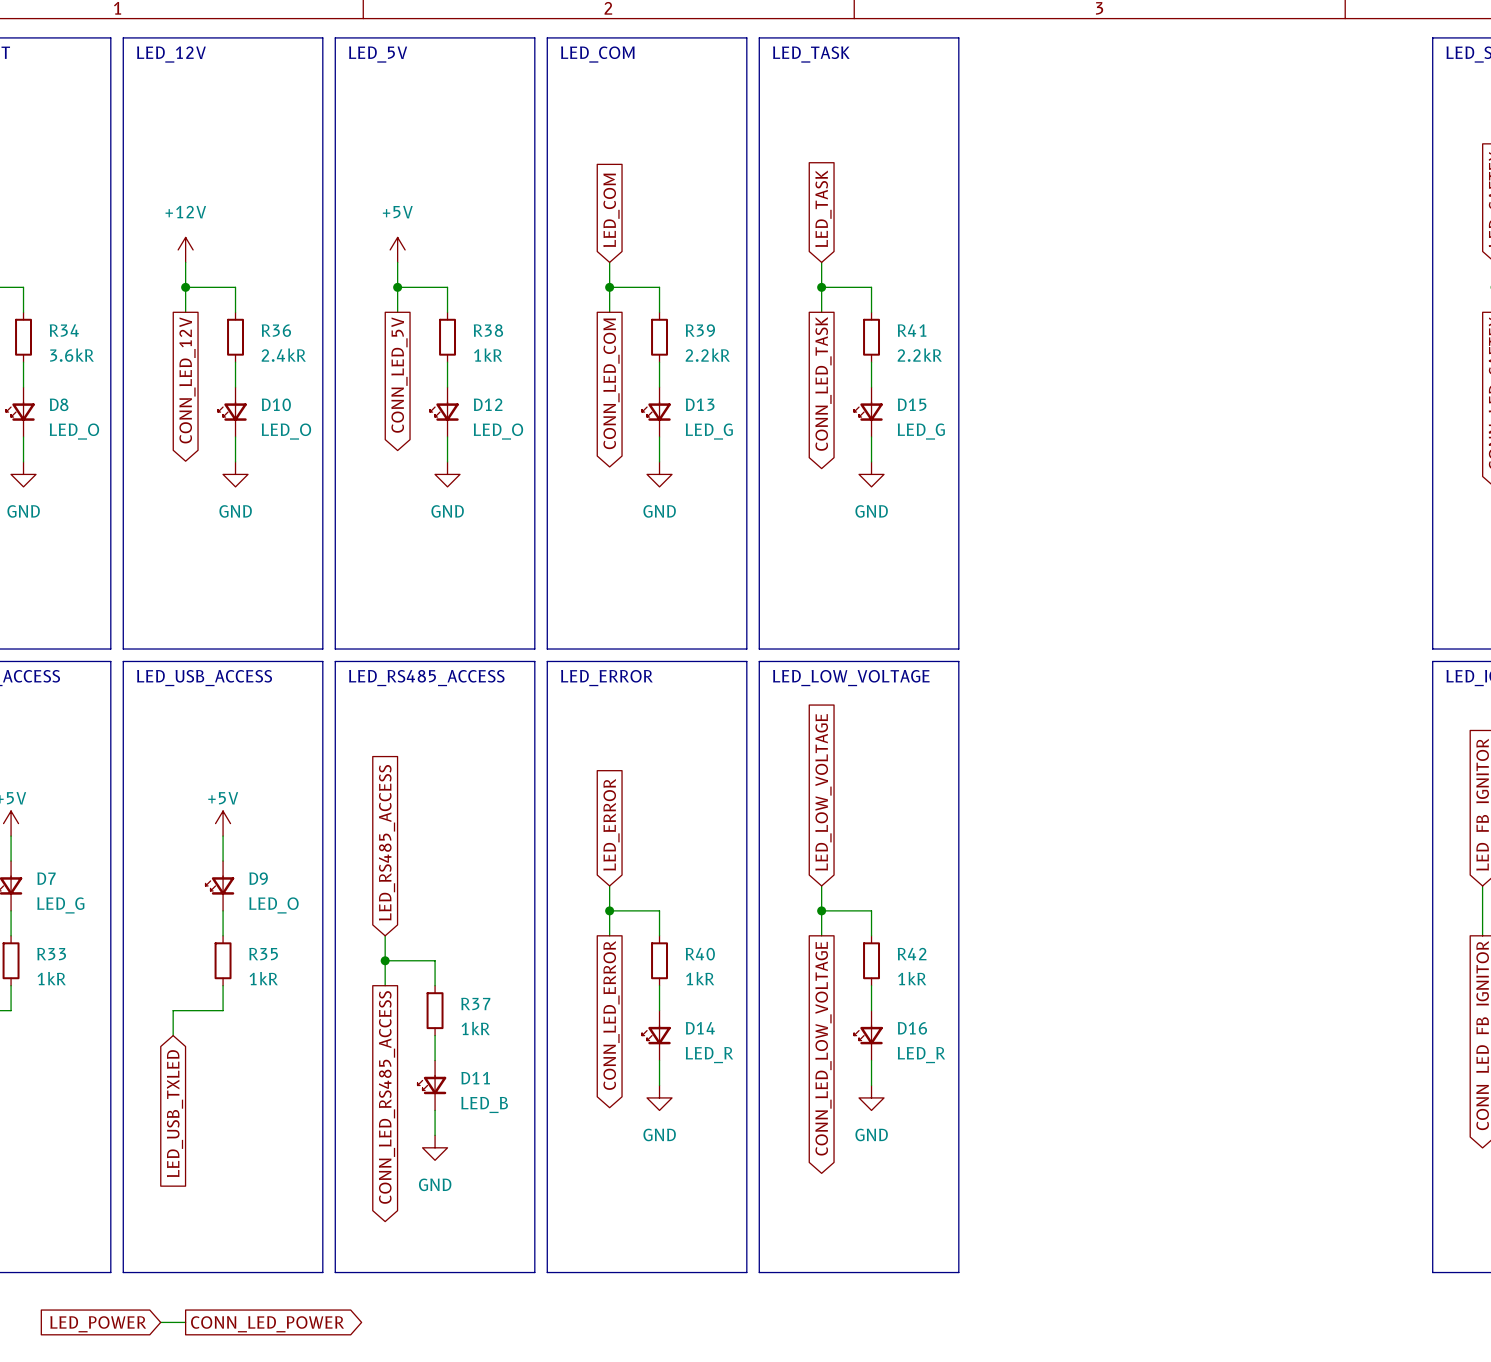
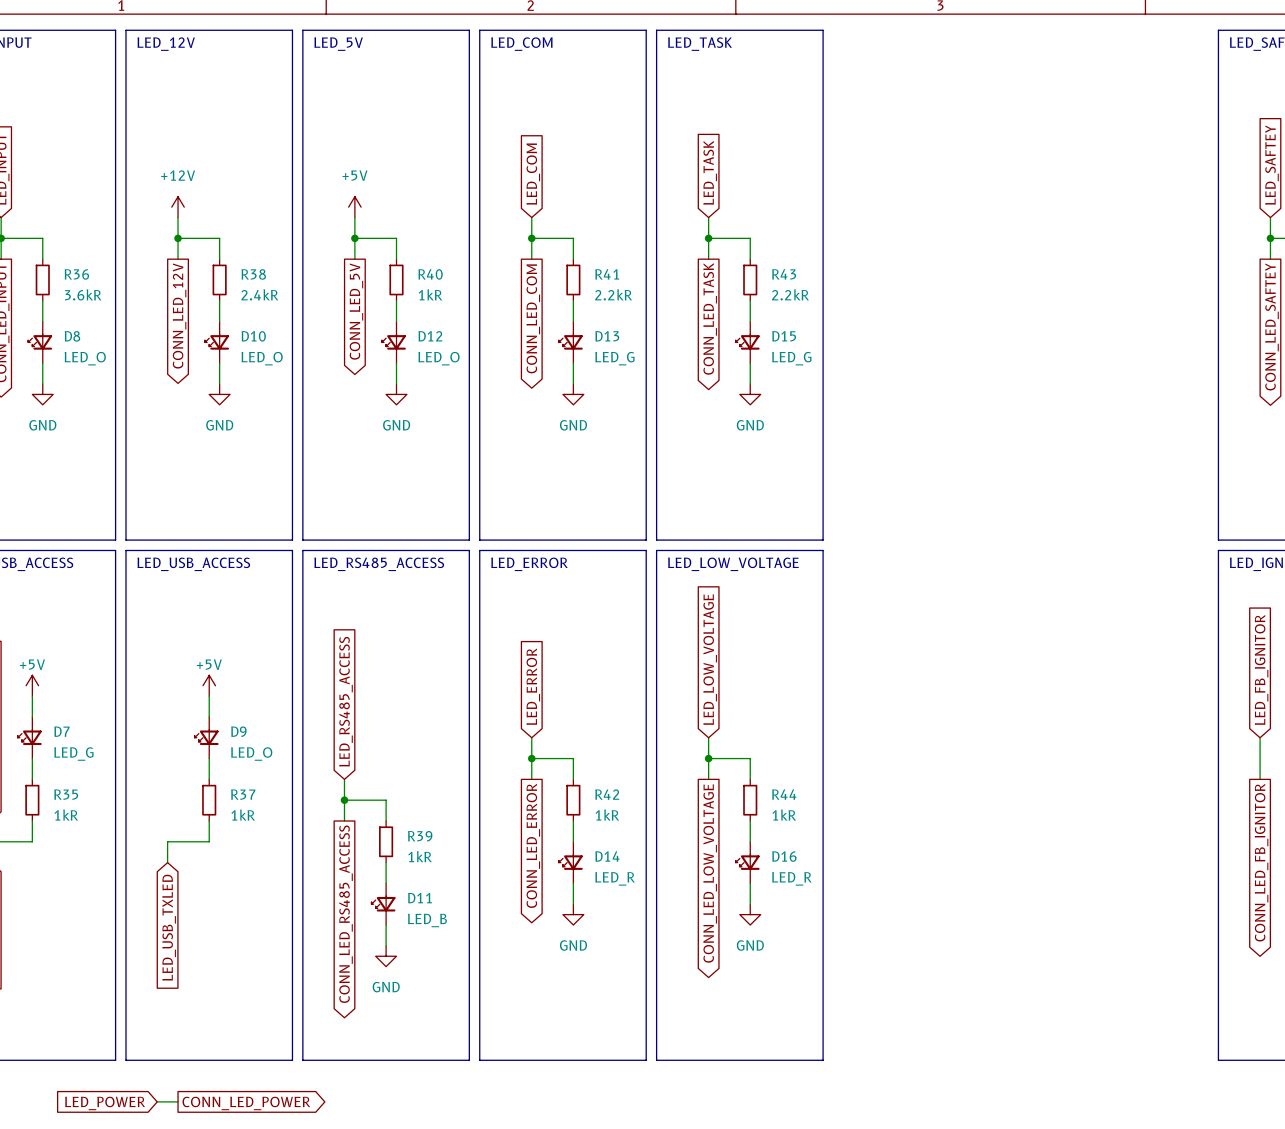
R34 name: R34 (64, 330) -> R36 (76, 274)
R36 name: R36 (276, 330) -> R38 (253, 274)
R38 name: R38 (488, 330) -> R40 (430, 274)
R39 name: R39 (700, 330) -> R41 (607, 274)
R41 name: R41 (912, 330) -> R43 (784, 274)
R33 name: R33 (51, 954) -> R35 (66, 794)
R35 name: R35 (263, 954) -> R37 (243, 794)
R40 name: R40 (700, 954) -> R42 (607, 794)
R42 name: R42 (912, 954) -> R44 (784, 794)
R37 name: R37 (475, 1003) -> R39 (420, 836)

